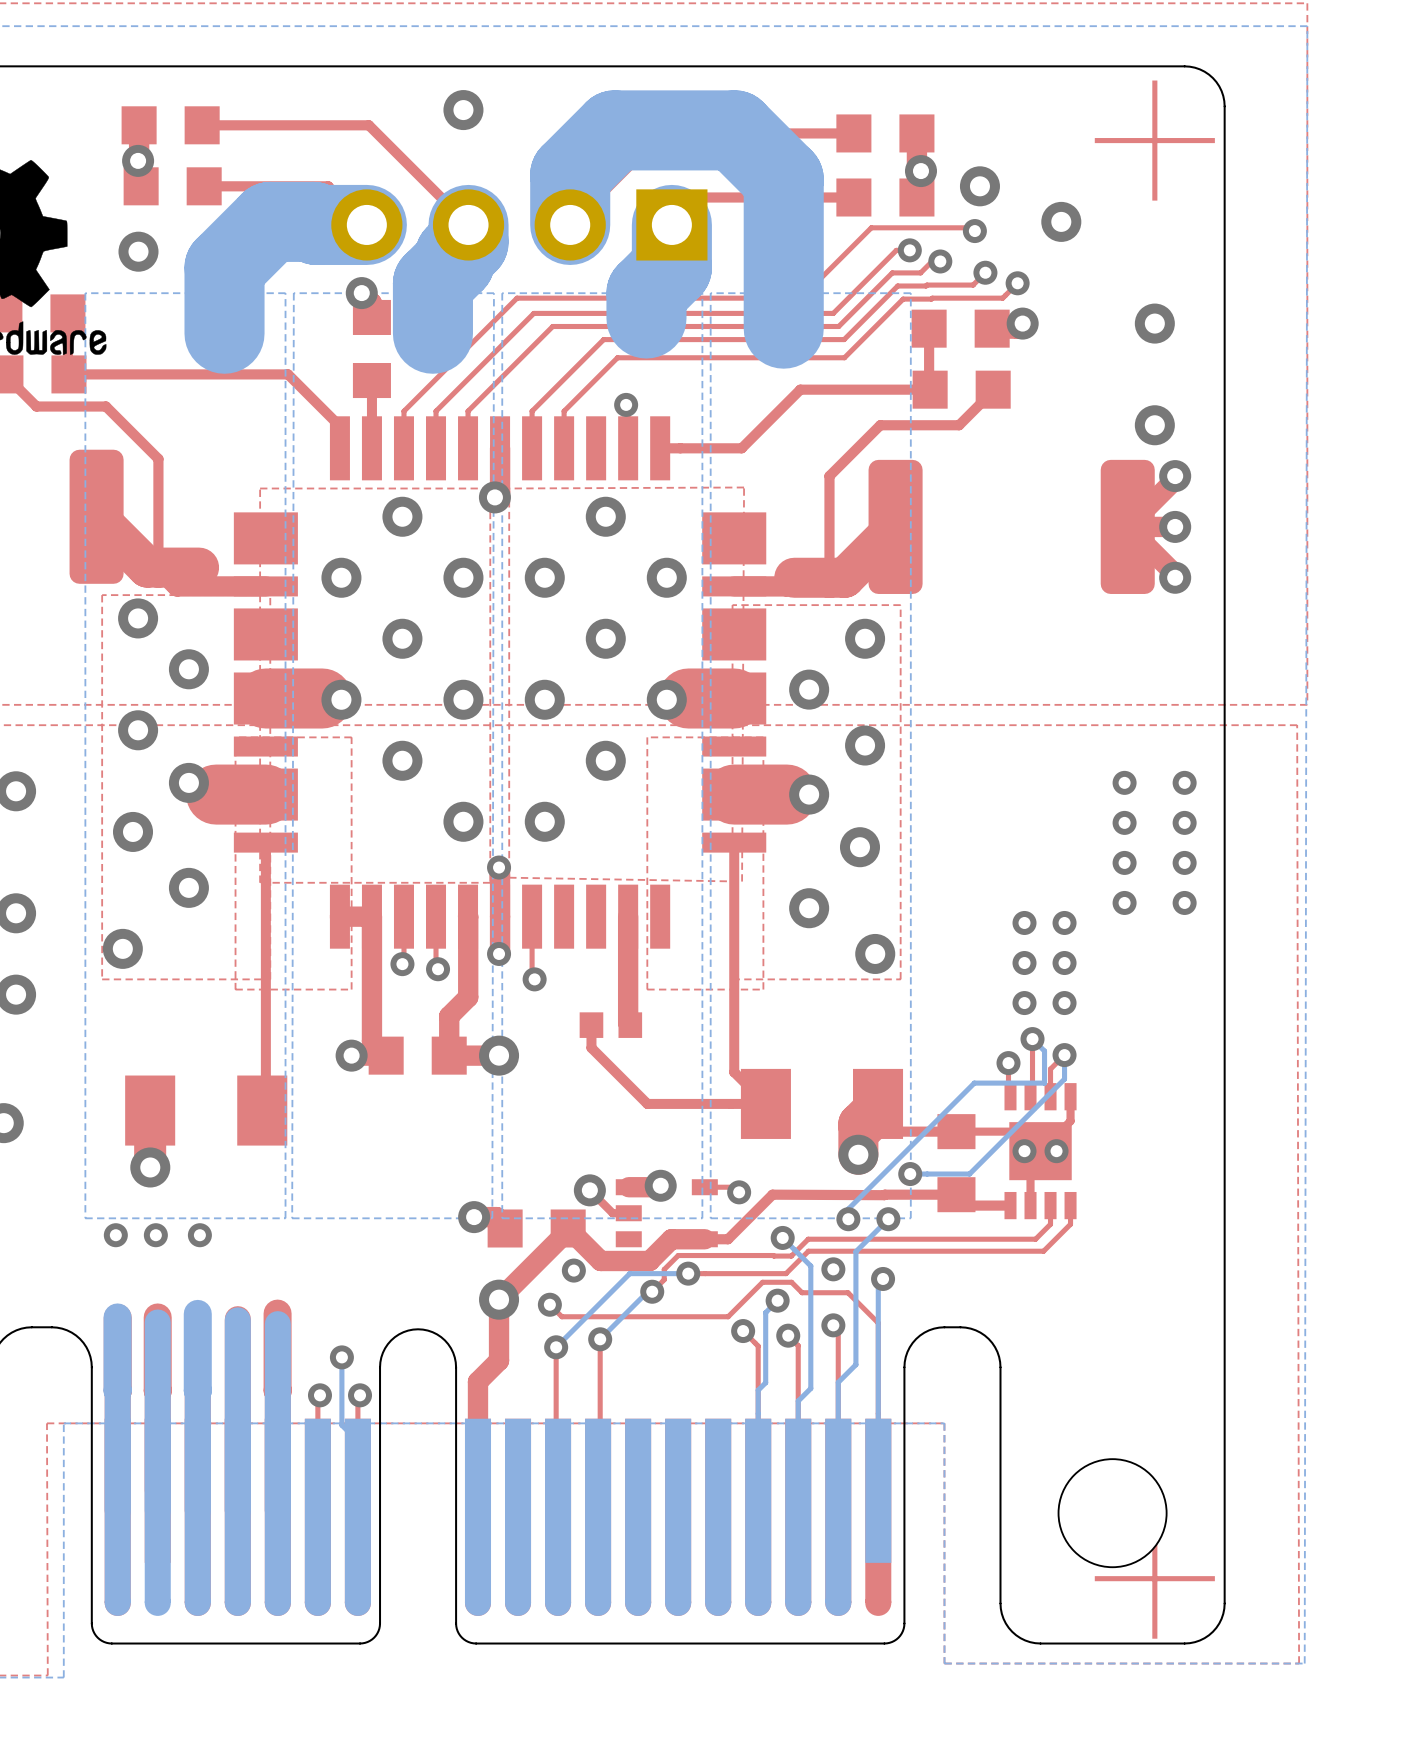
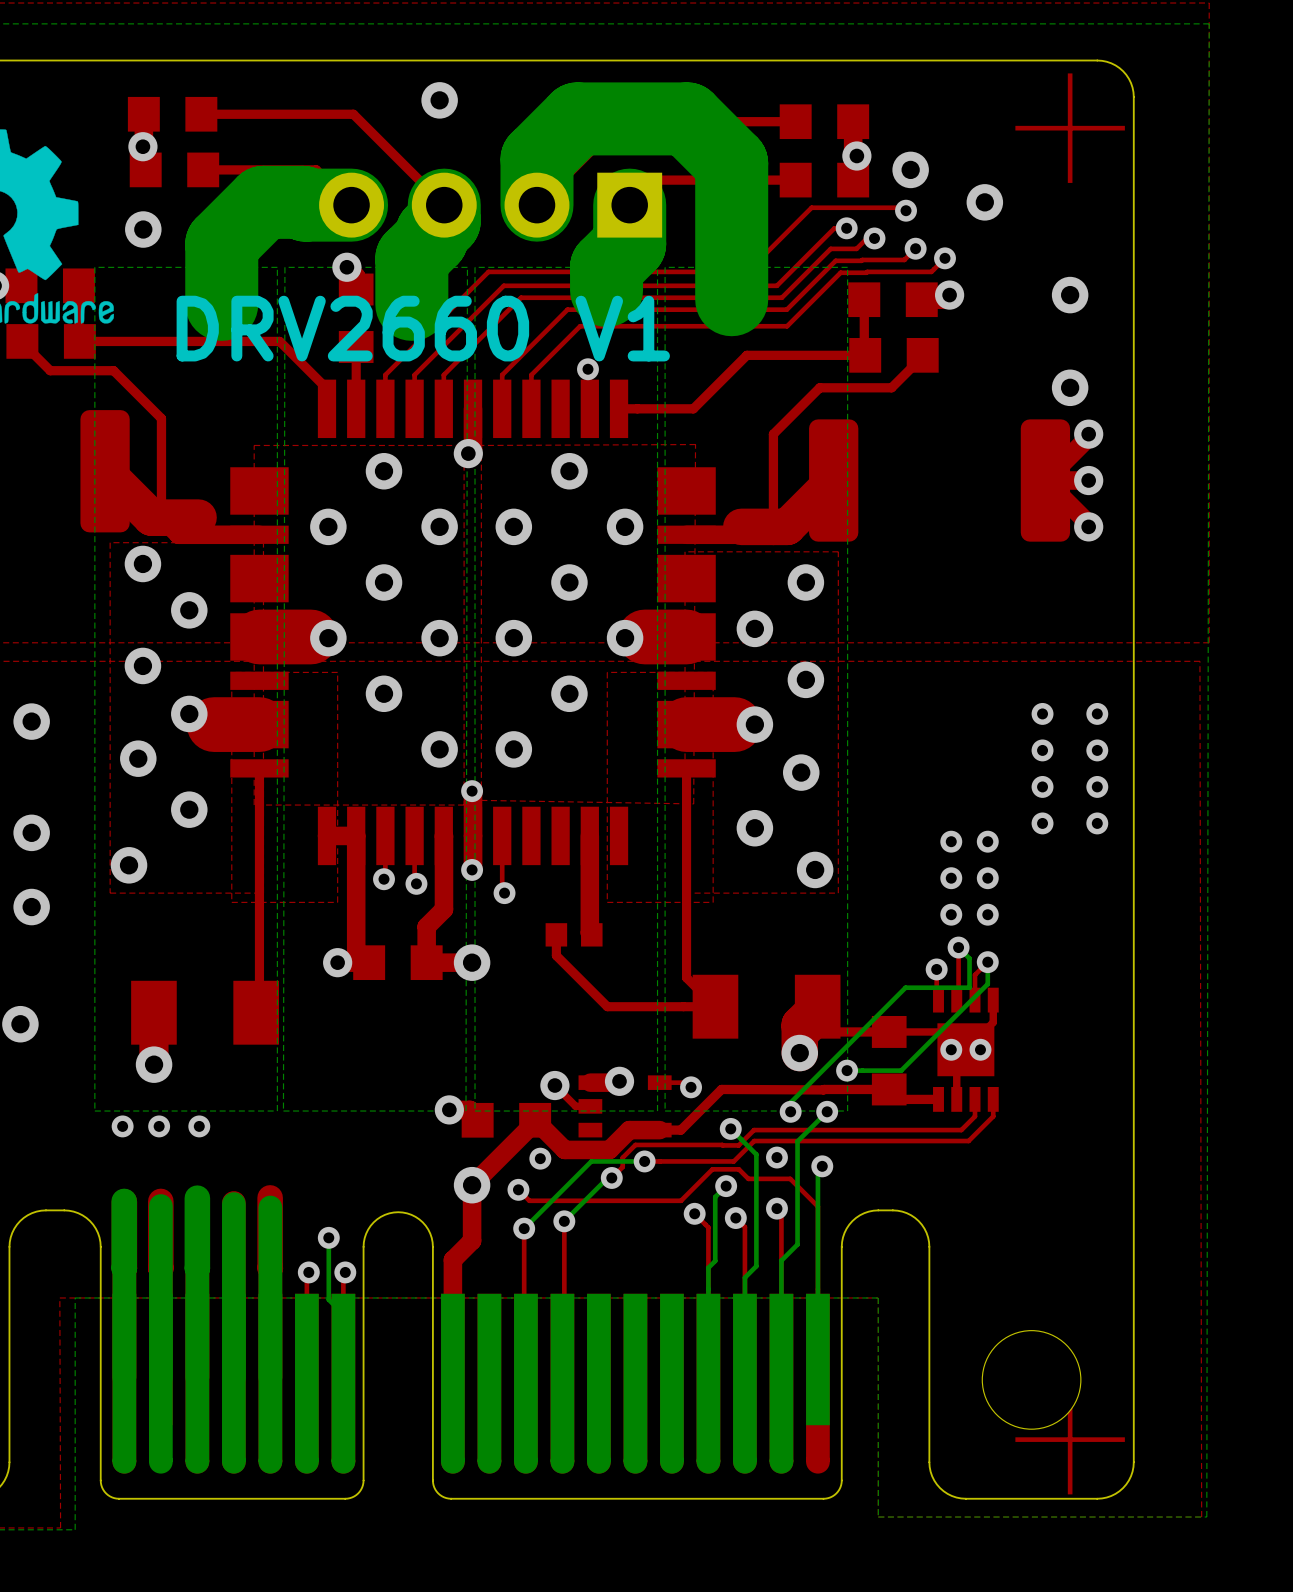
text: none -> DRV2660 V1 (423, 328)

